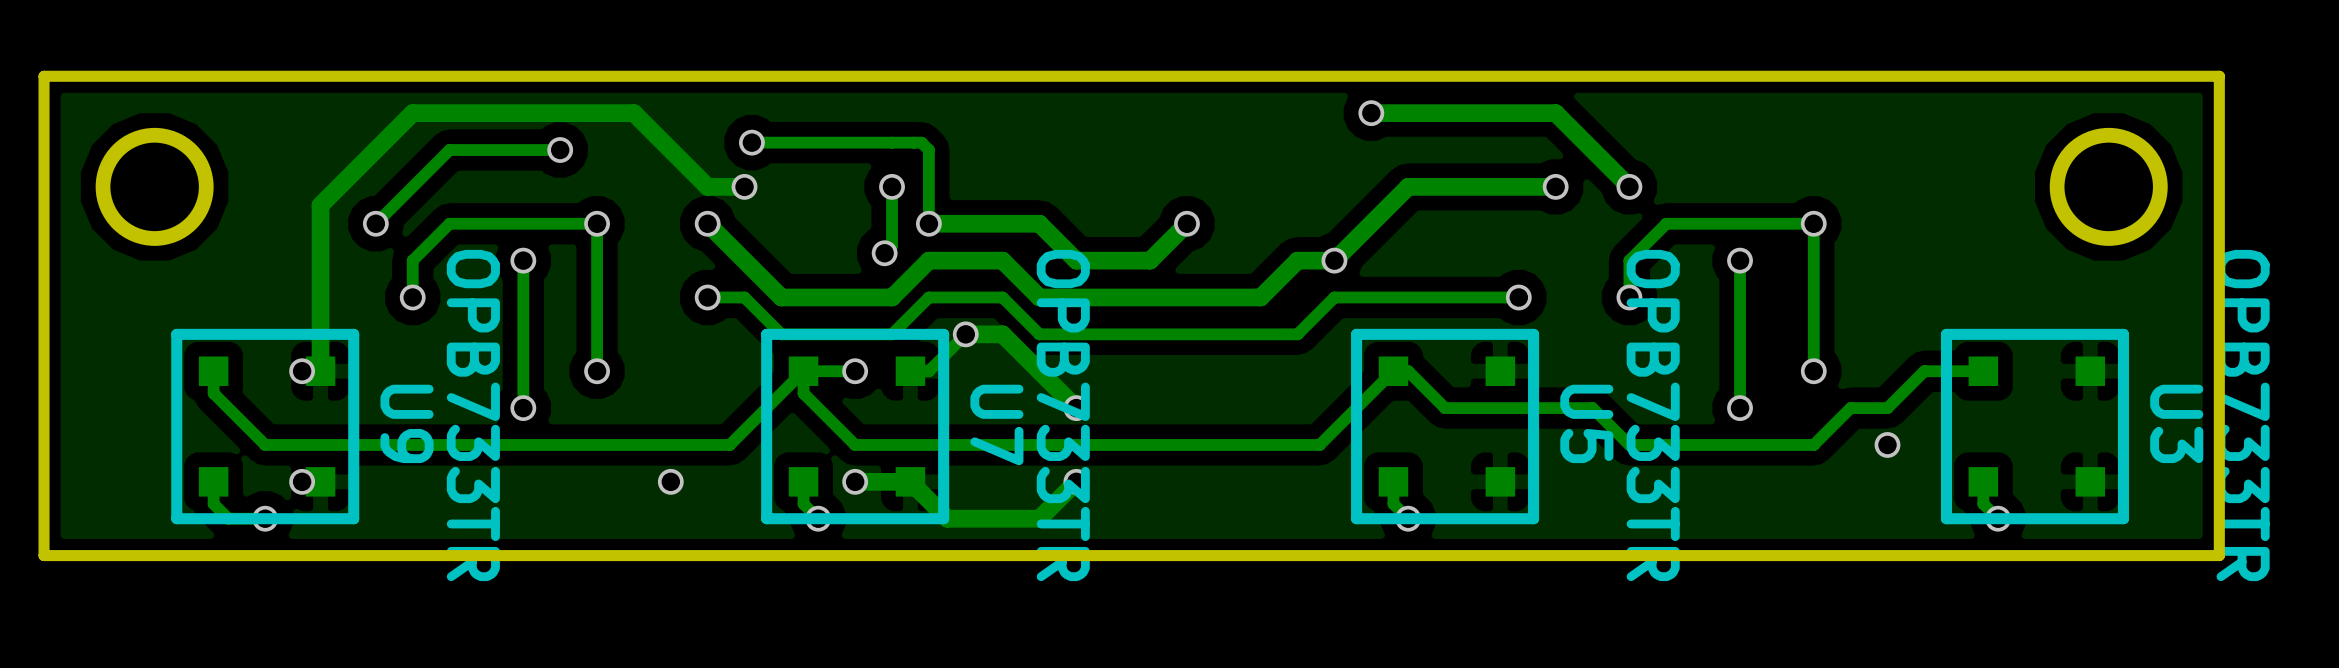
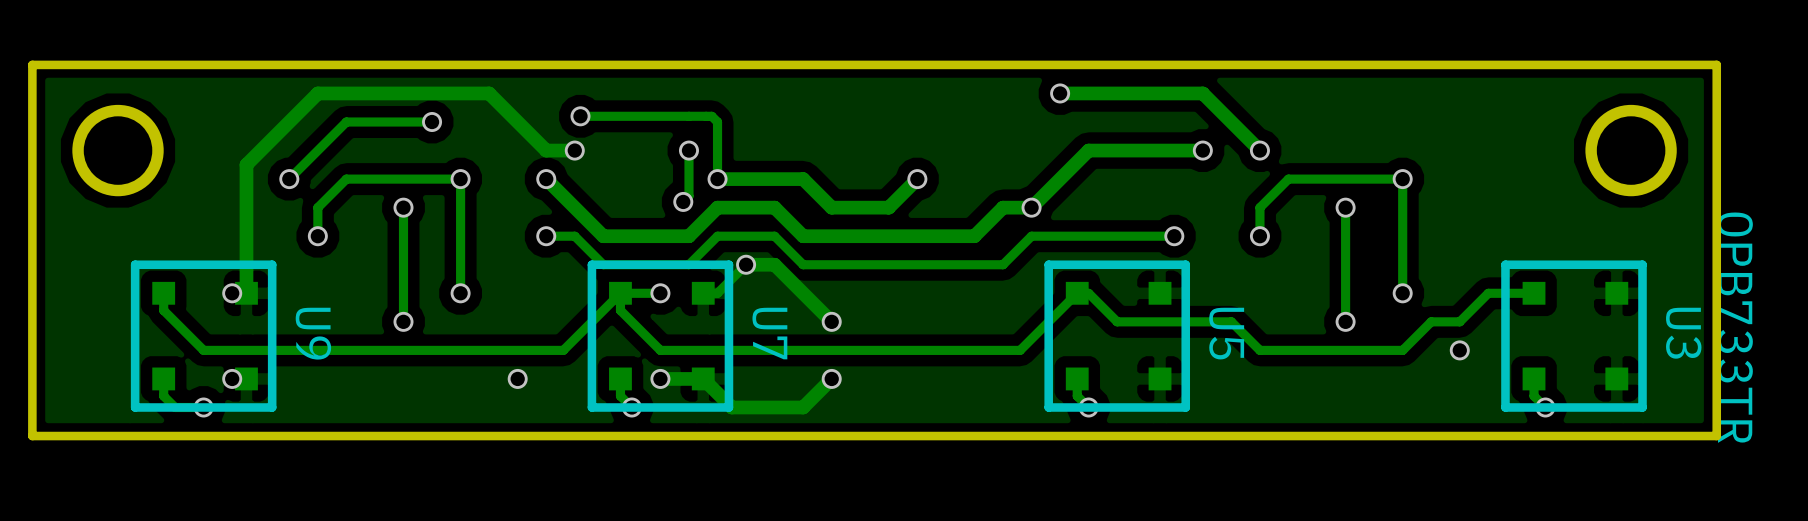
U9 value: OPB733TR (473, 415) -> none
U7 value: OPB733TR (1063, 415) -> none
U5 value: OPB733TR (1653, 415) -> none

